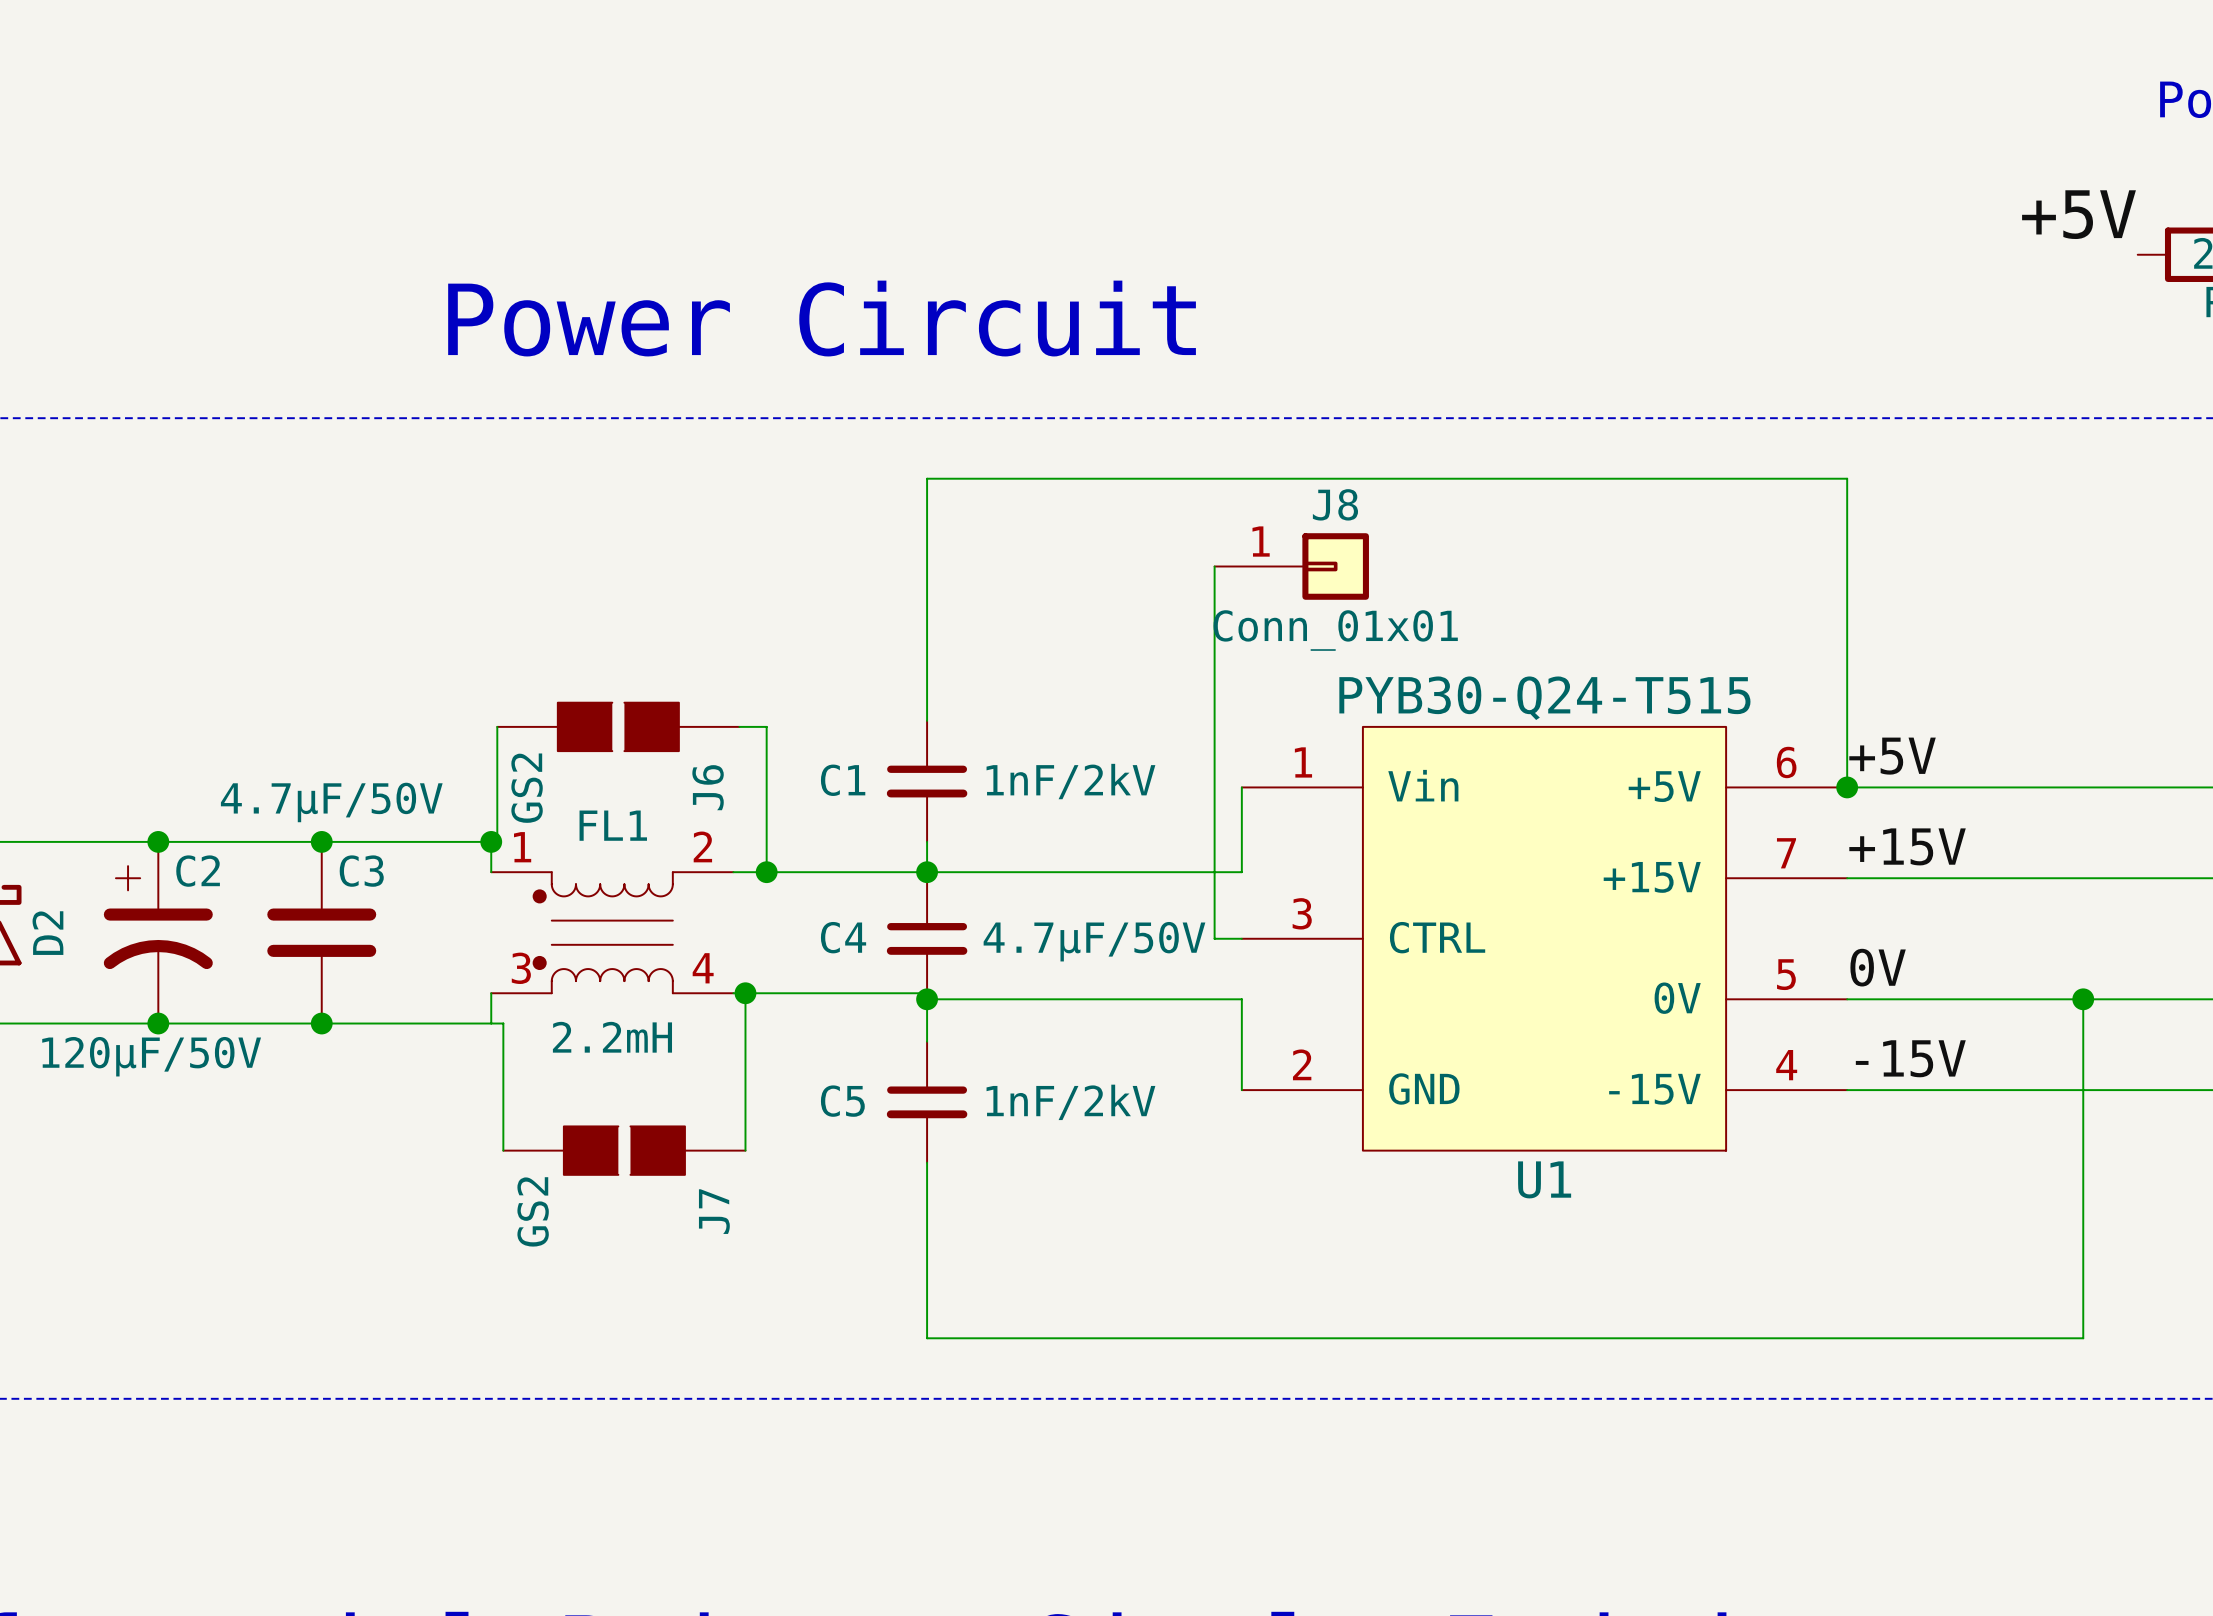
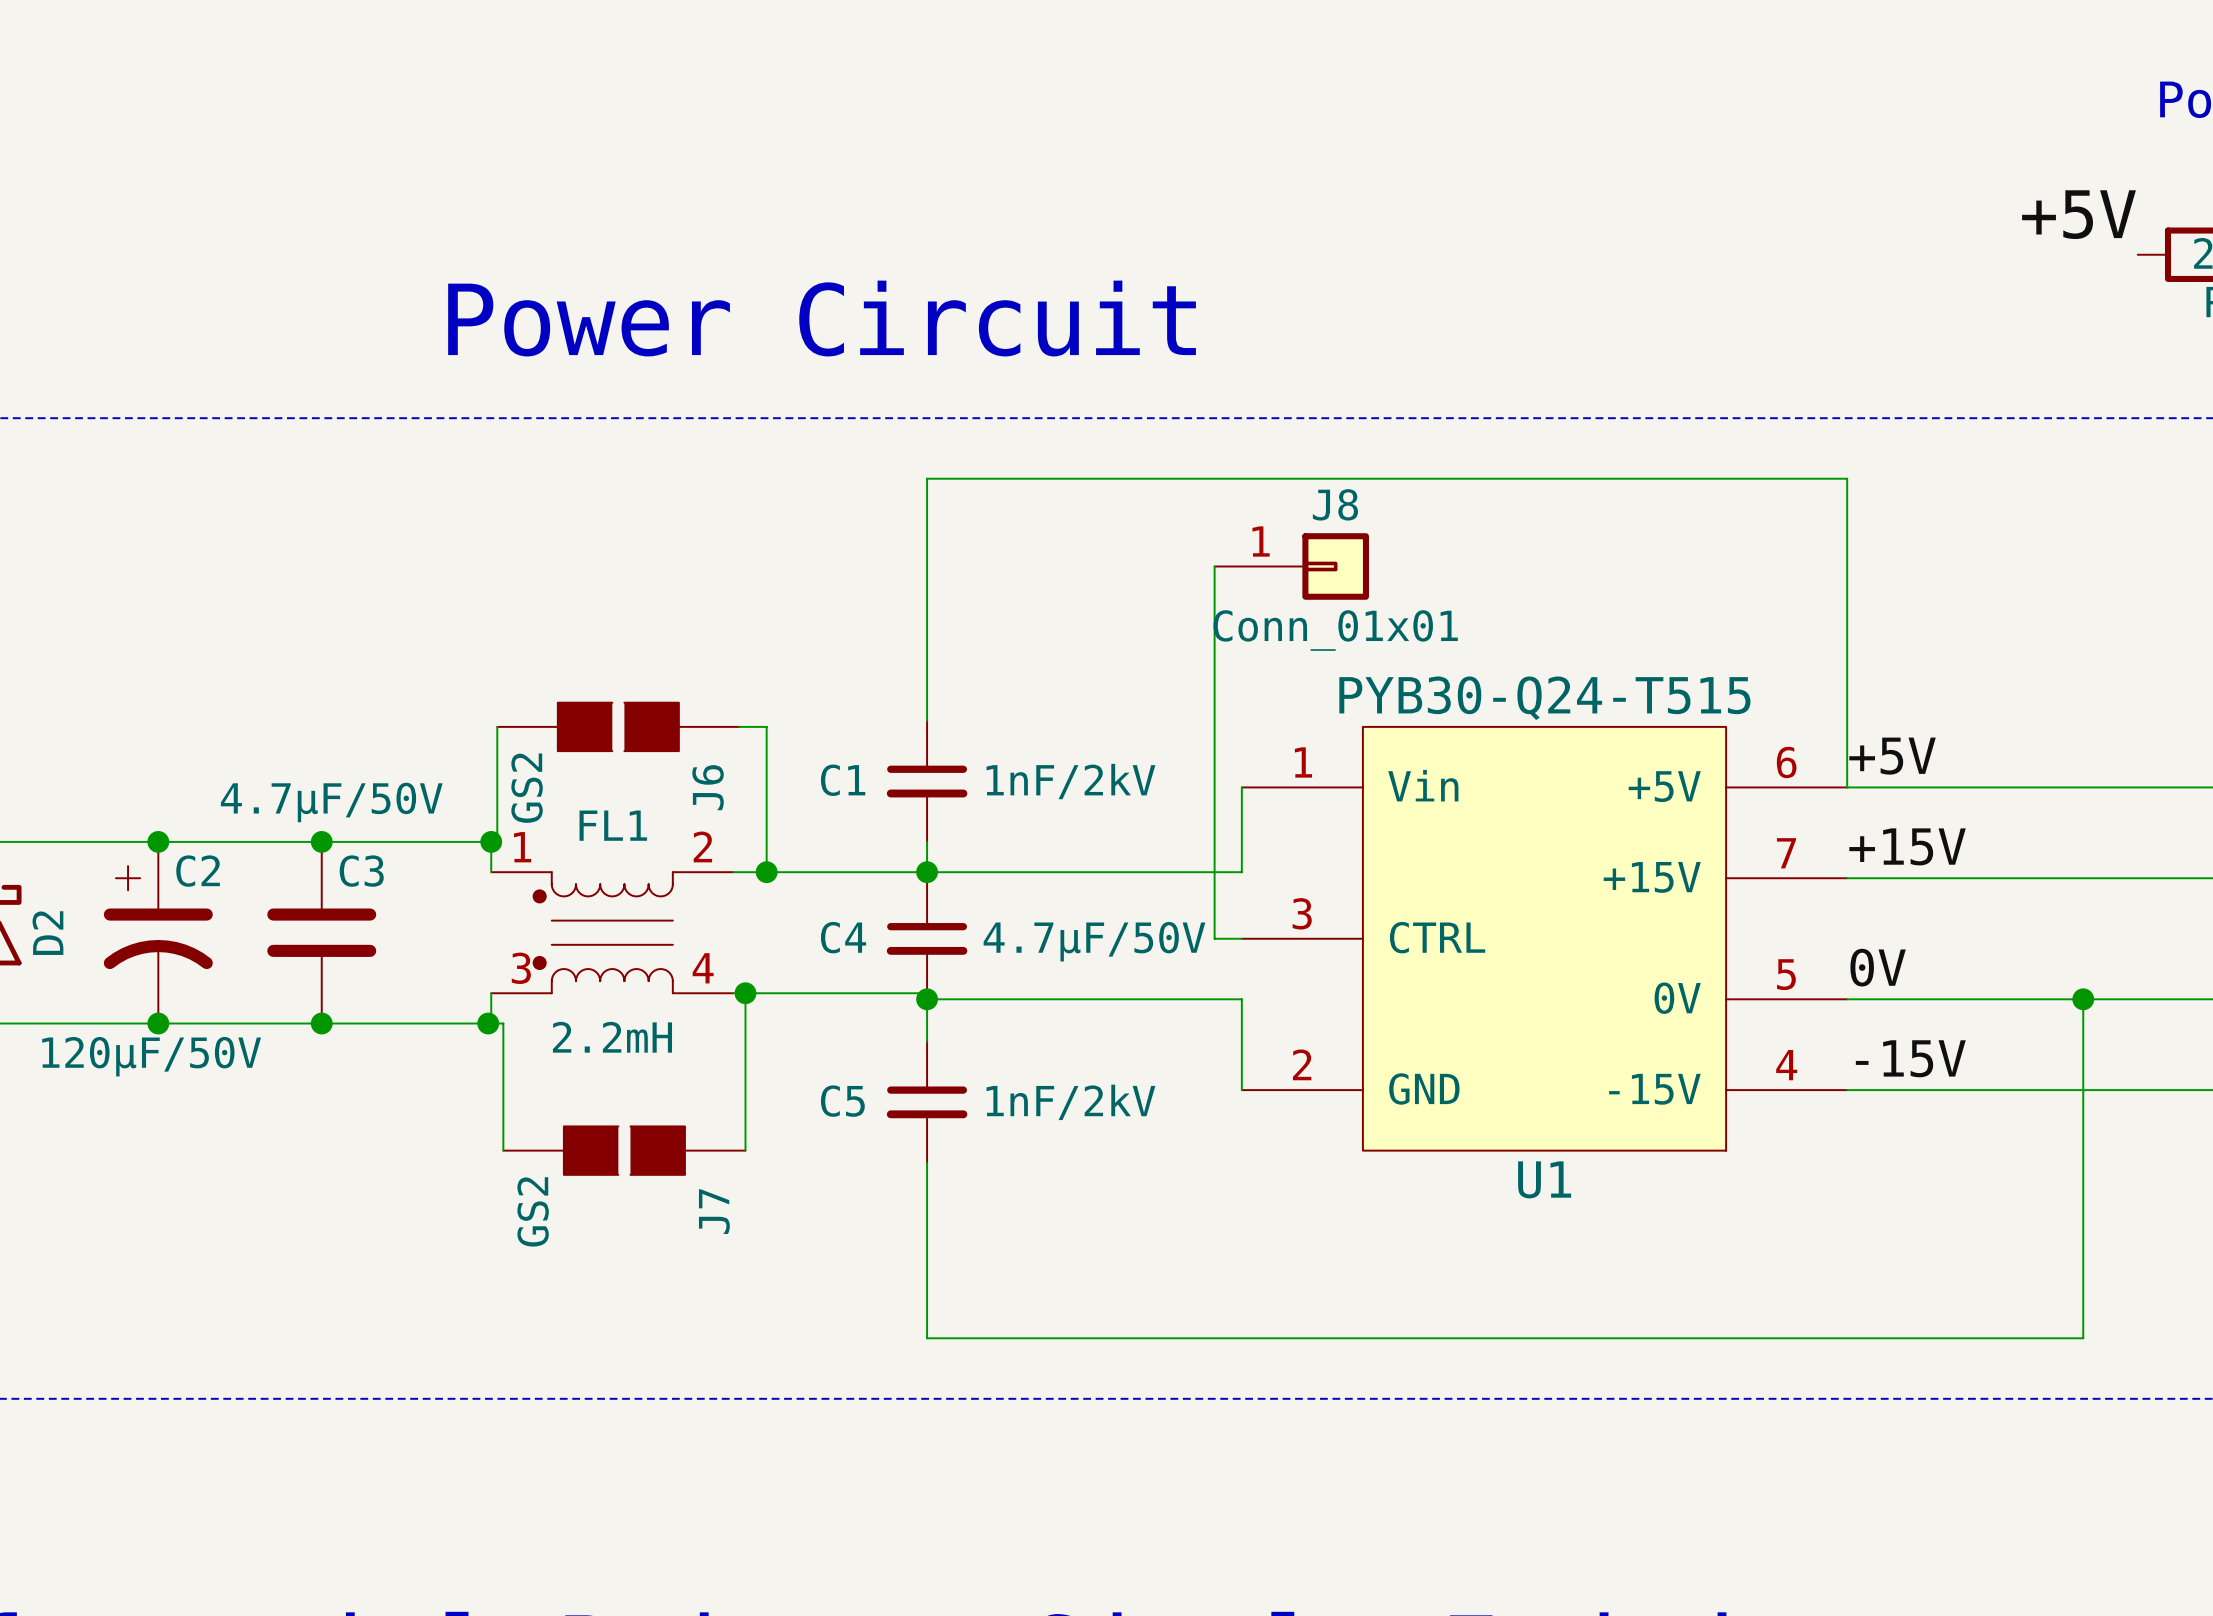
junction: (1847, 787) -> none
junction: none -> (488, 1023)

